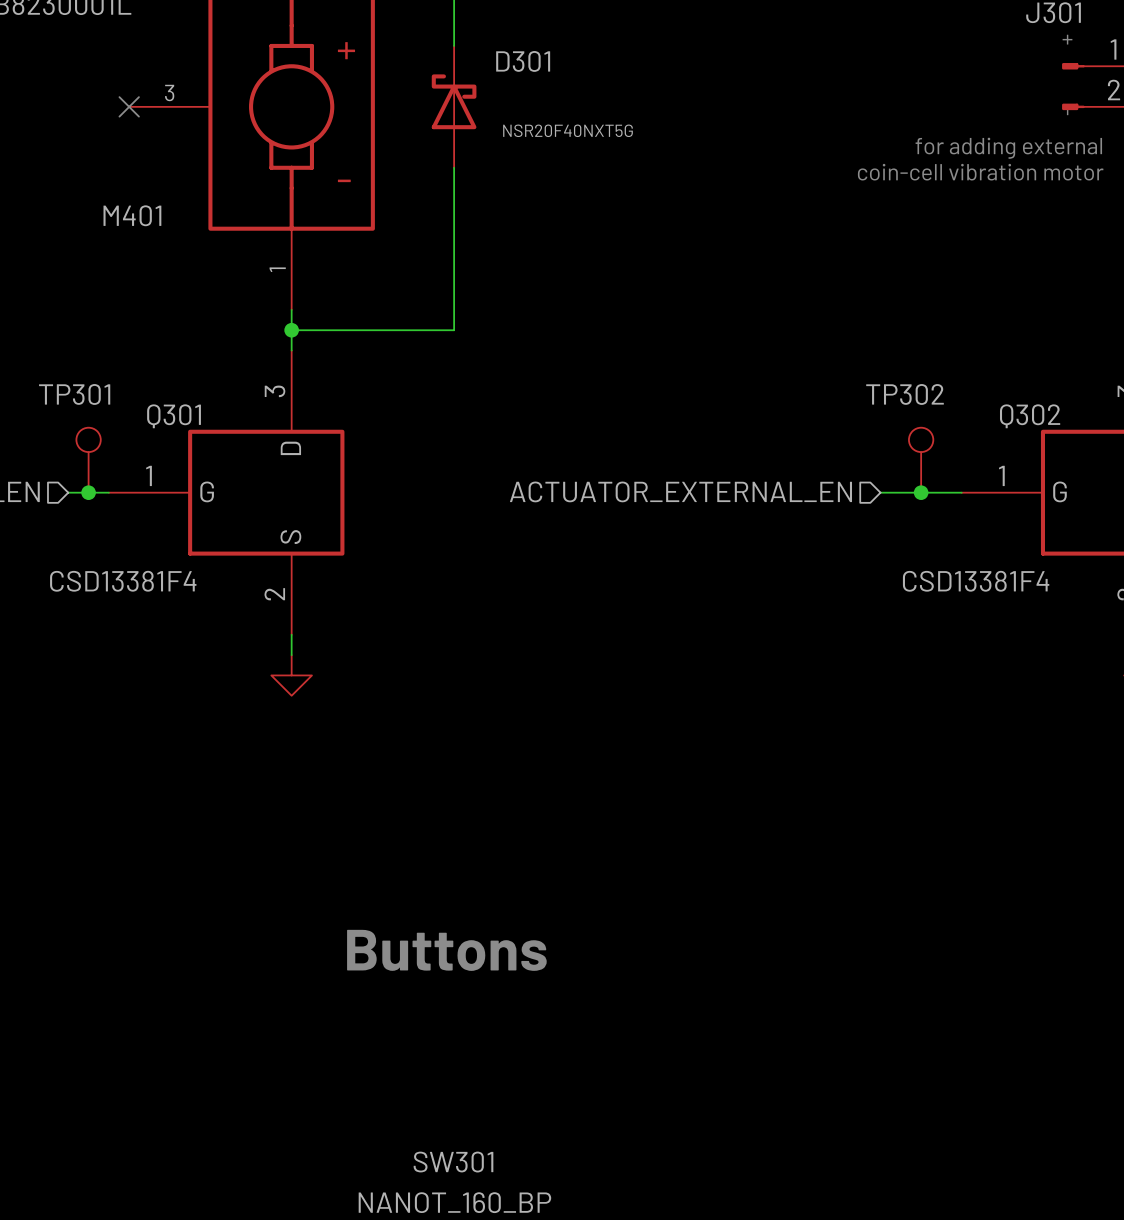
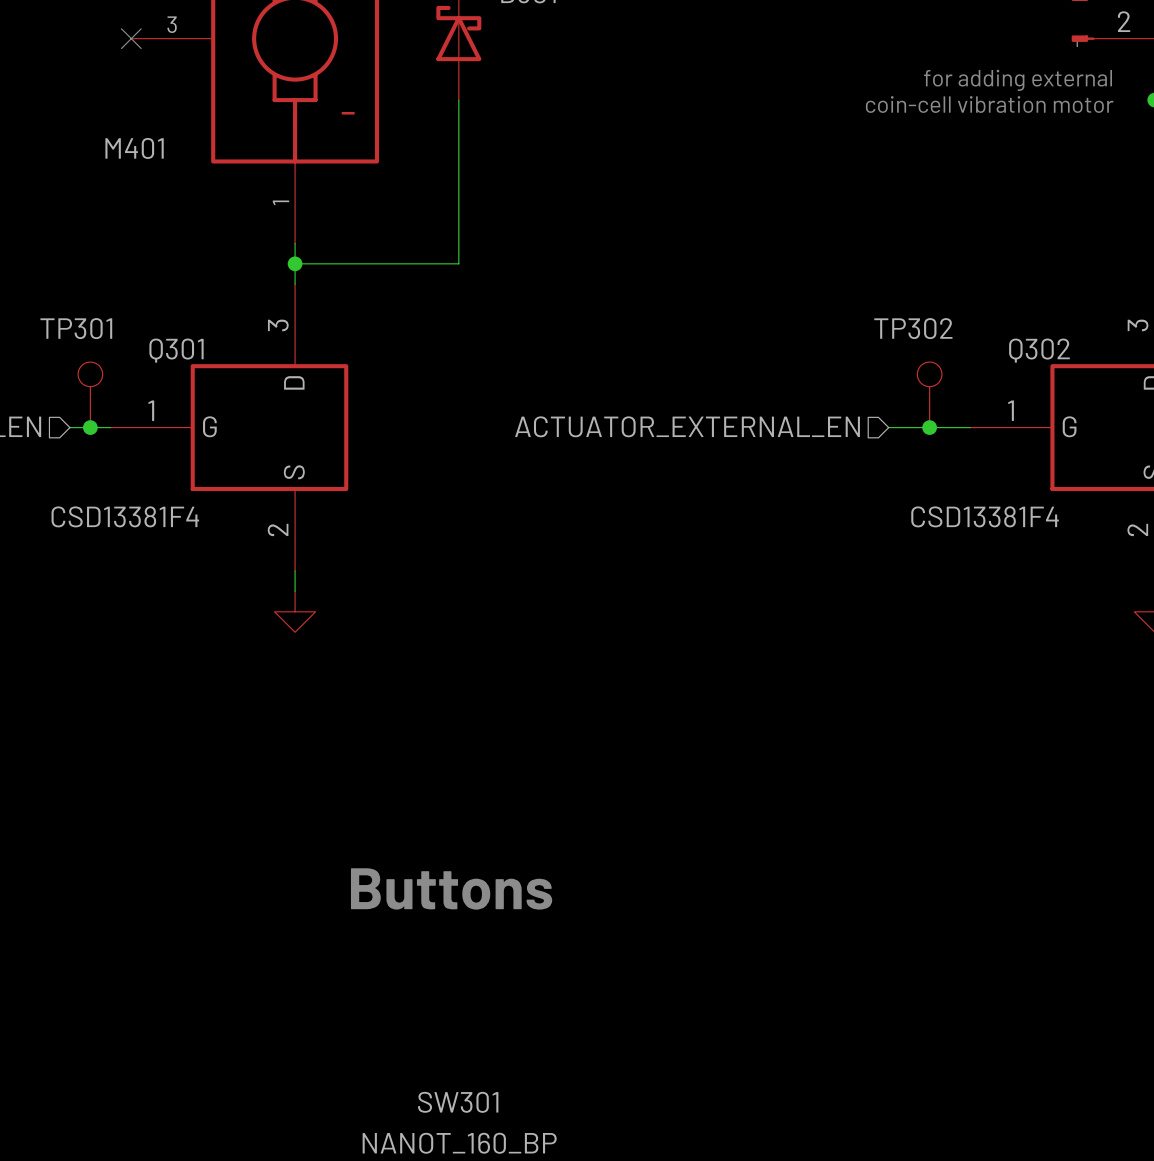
D301 text: NSR20F40NXT5G (568, 130) -> none

